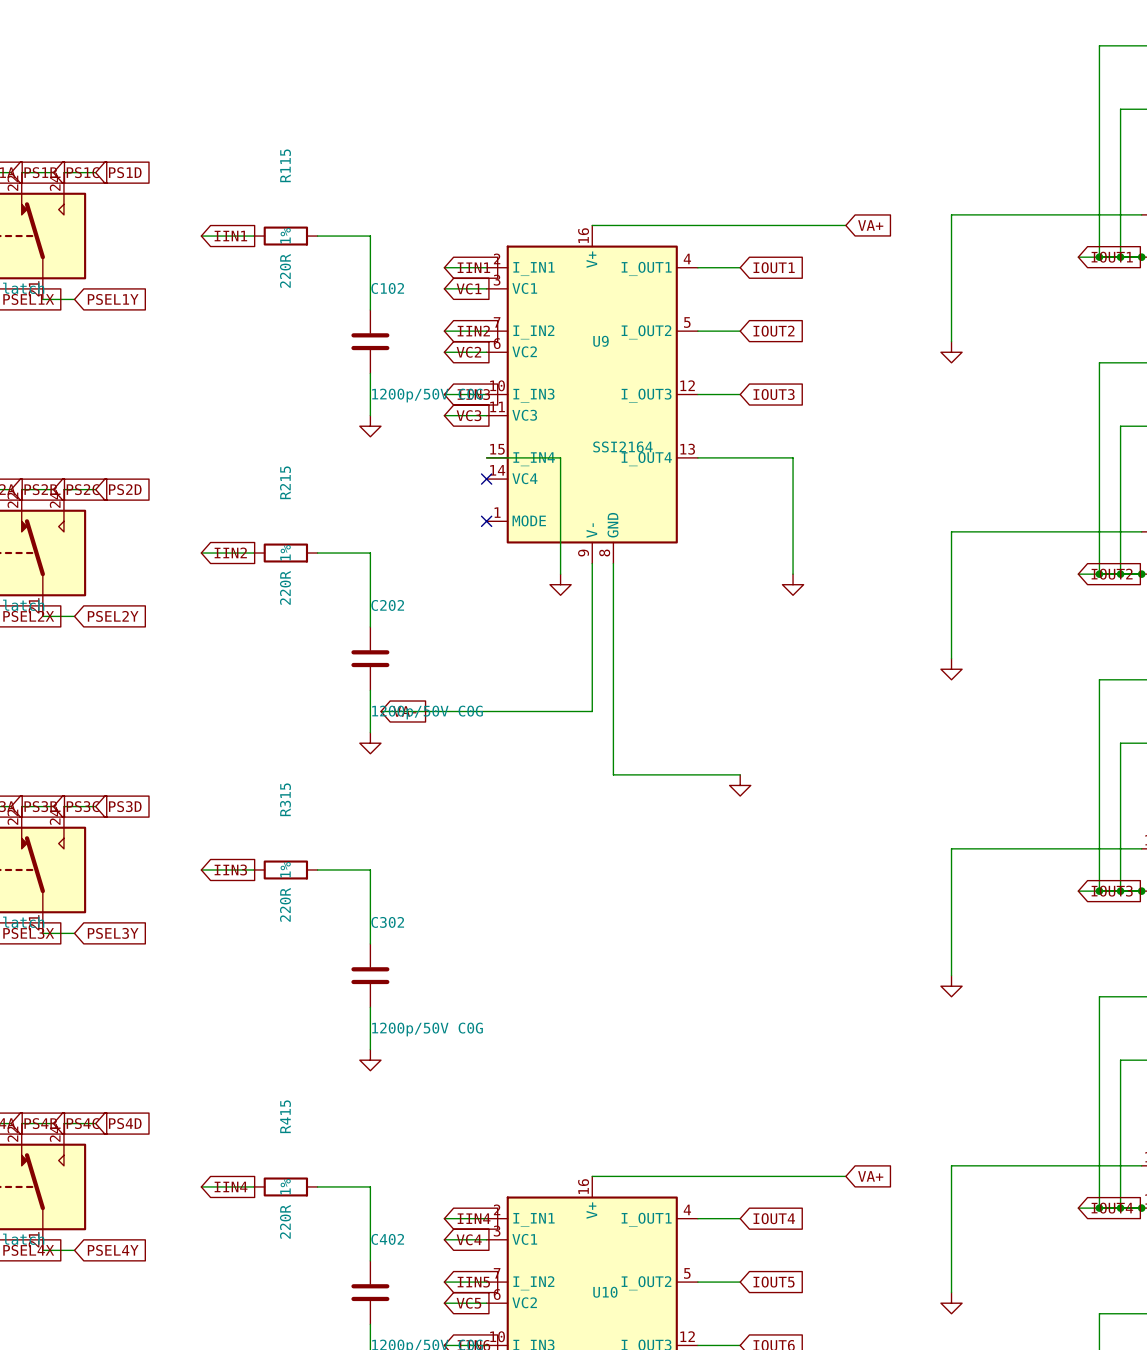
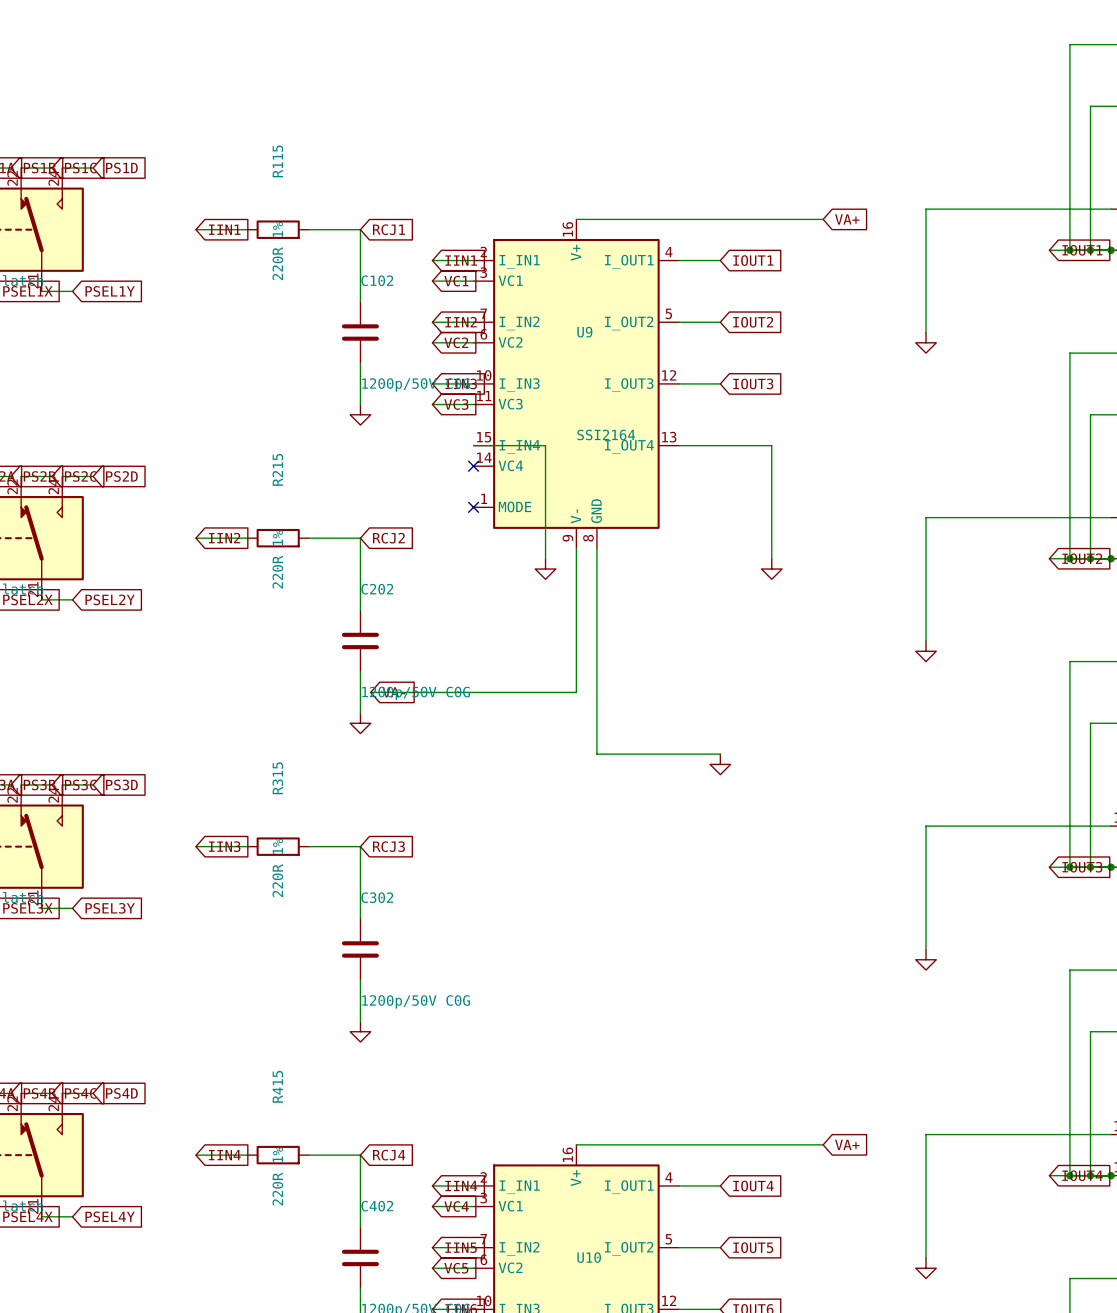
global label: none -> RCJ1 (389, 229)
global label: none -> RCJ2 (388, 538)
global label: none -> RCJ3 (388, 846)
global label: none -> RCJ4 (389, 1155)

